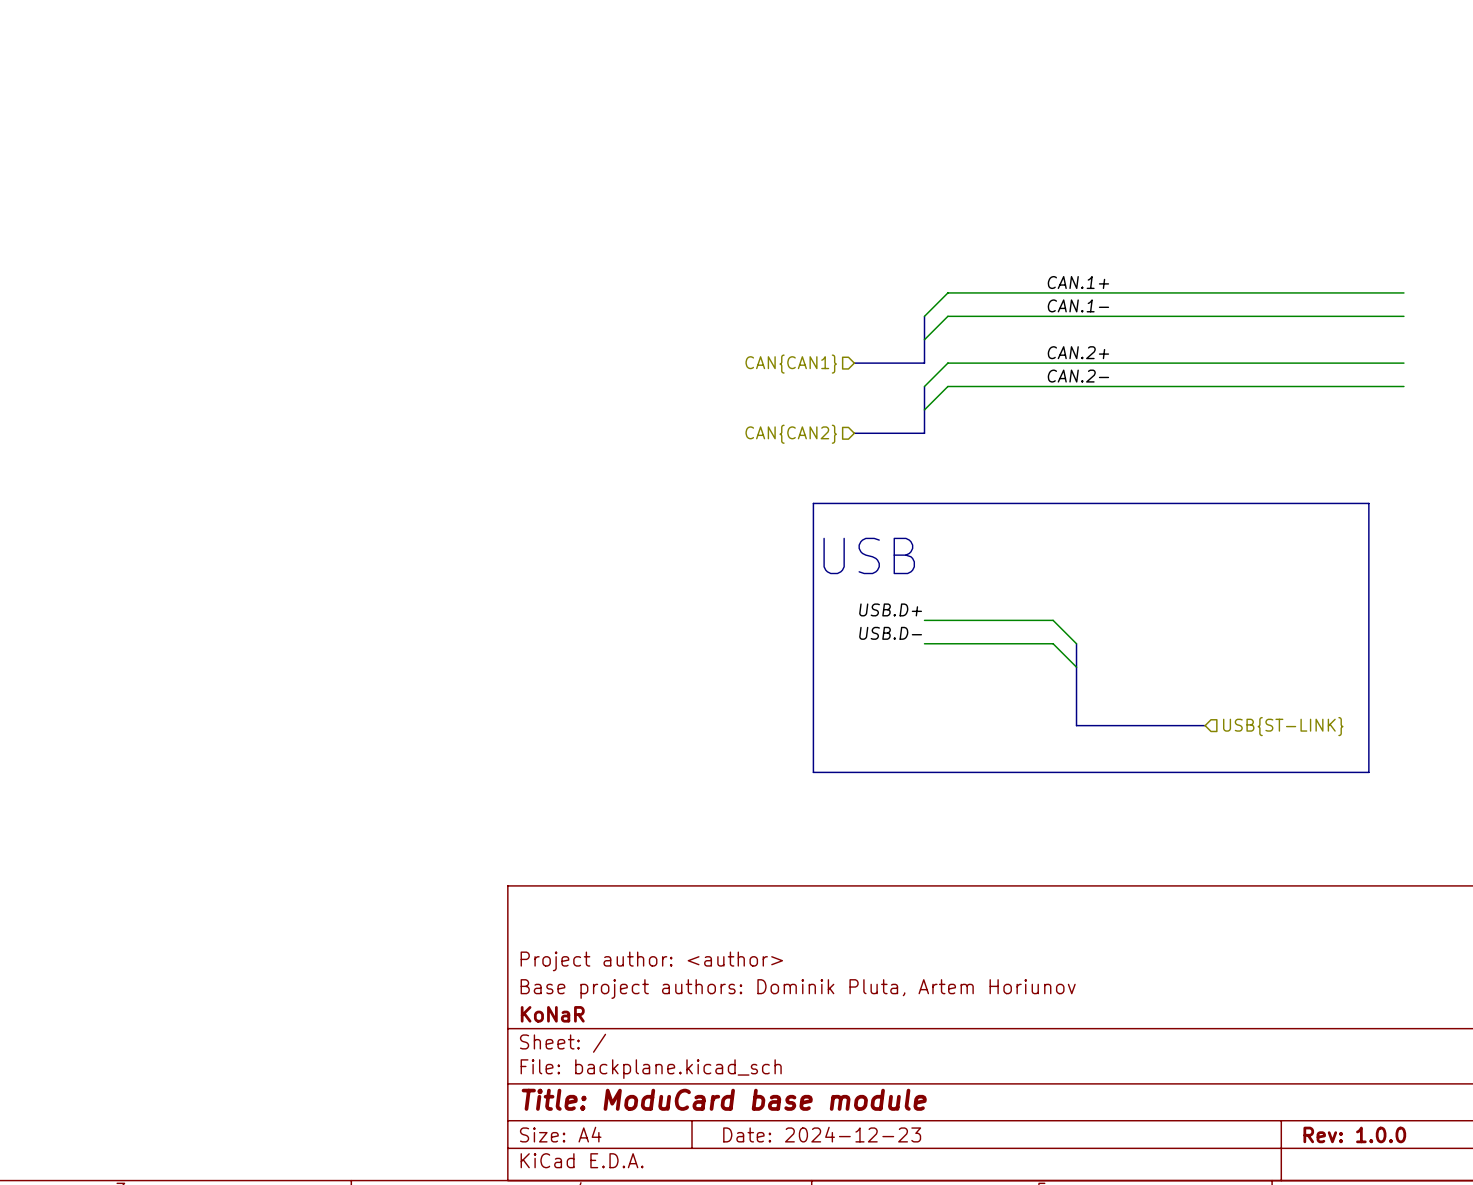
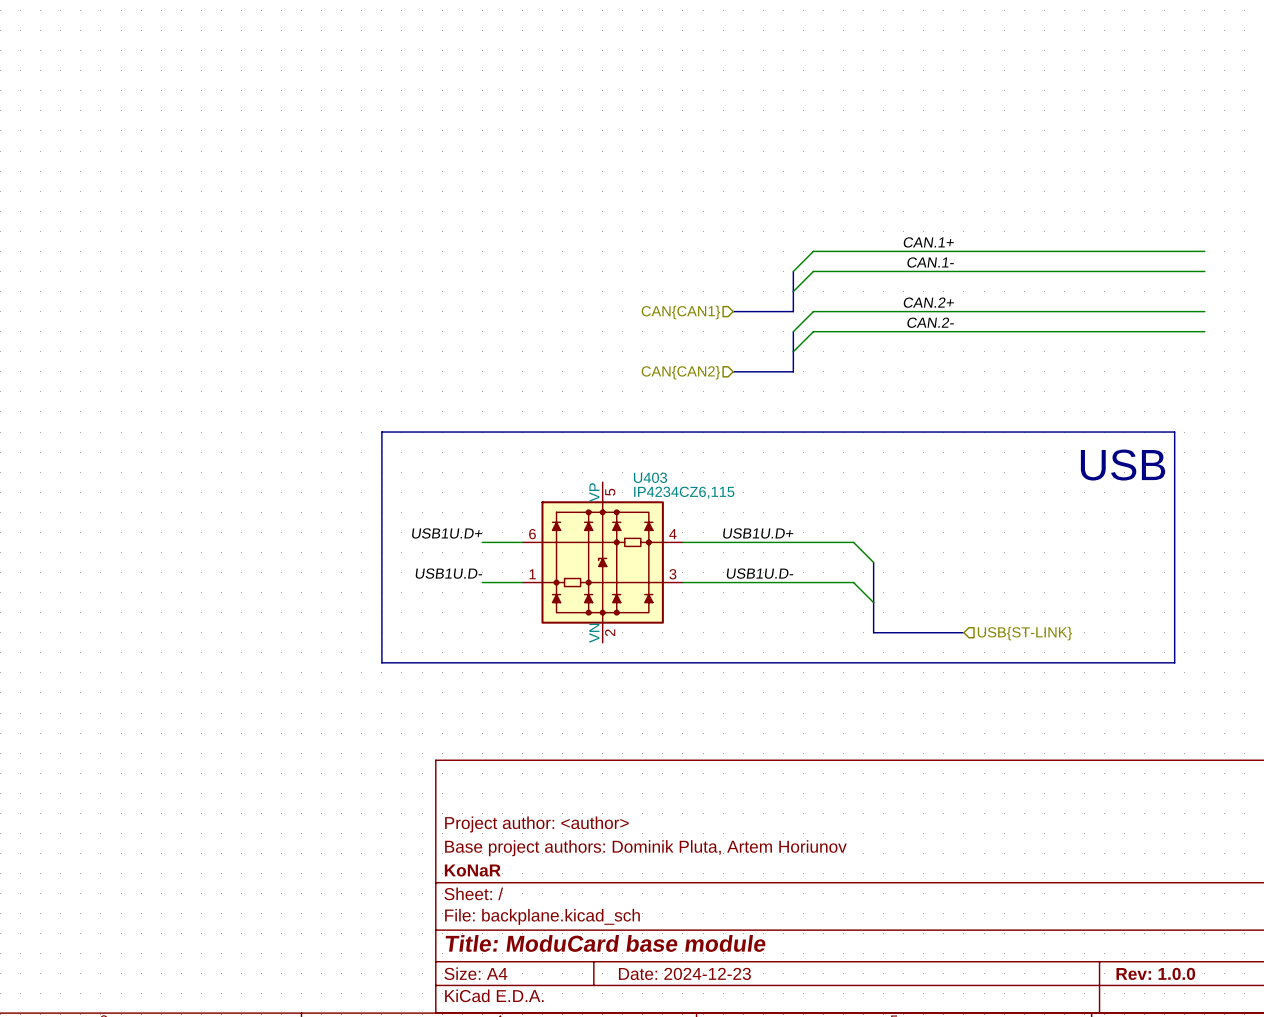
line: (813, 503) (813, 772) -> (698, 432) (381, 432) (381, 662) (698, 662)
text: none -> USB (1123, 465)
text: USB (869, 555) -> none
label: USB.D+ (890, 609) -> none
wire: (924, 620) (1053, 620) (1076, 643) -> none
label: none -> USB1U.D+ (447, 533)
label: none -> USB1U.D+ (758, 533)
wire: none -> (482, 542) (522, 542)
wire: none -> (682, 542) (853, 542) (873, 562)
label: USB.D- (890, 633) -> none
wire: (924, 643) (1053, 643) (1076, 667) -> none
bus: (1076, 643) (1076, 725) (1205, 725) -> none
U403: none -> IP4234CZ6,115 (602, 562)
bus: none -> (873, 562) (873, 632) (963, 632)
label: none -> USB1U.D- (448, 573)
label: none -> USB1U.D- (759, 573)
wire: none -> (482, 582) (522, 582)
wire: none -> (682, 582) (853, 582) (873, 602)
hierarchical label position: USB{ST-LINK} (1283, 726) -> USB{ST-LINK} (1024, 633)

